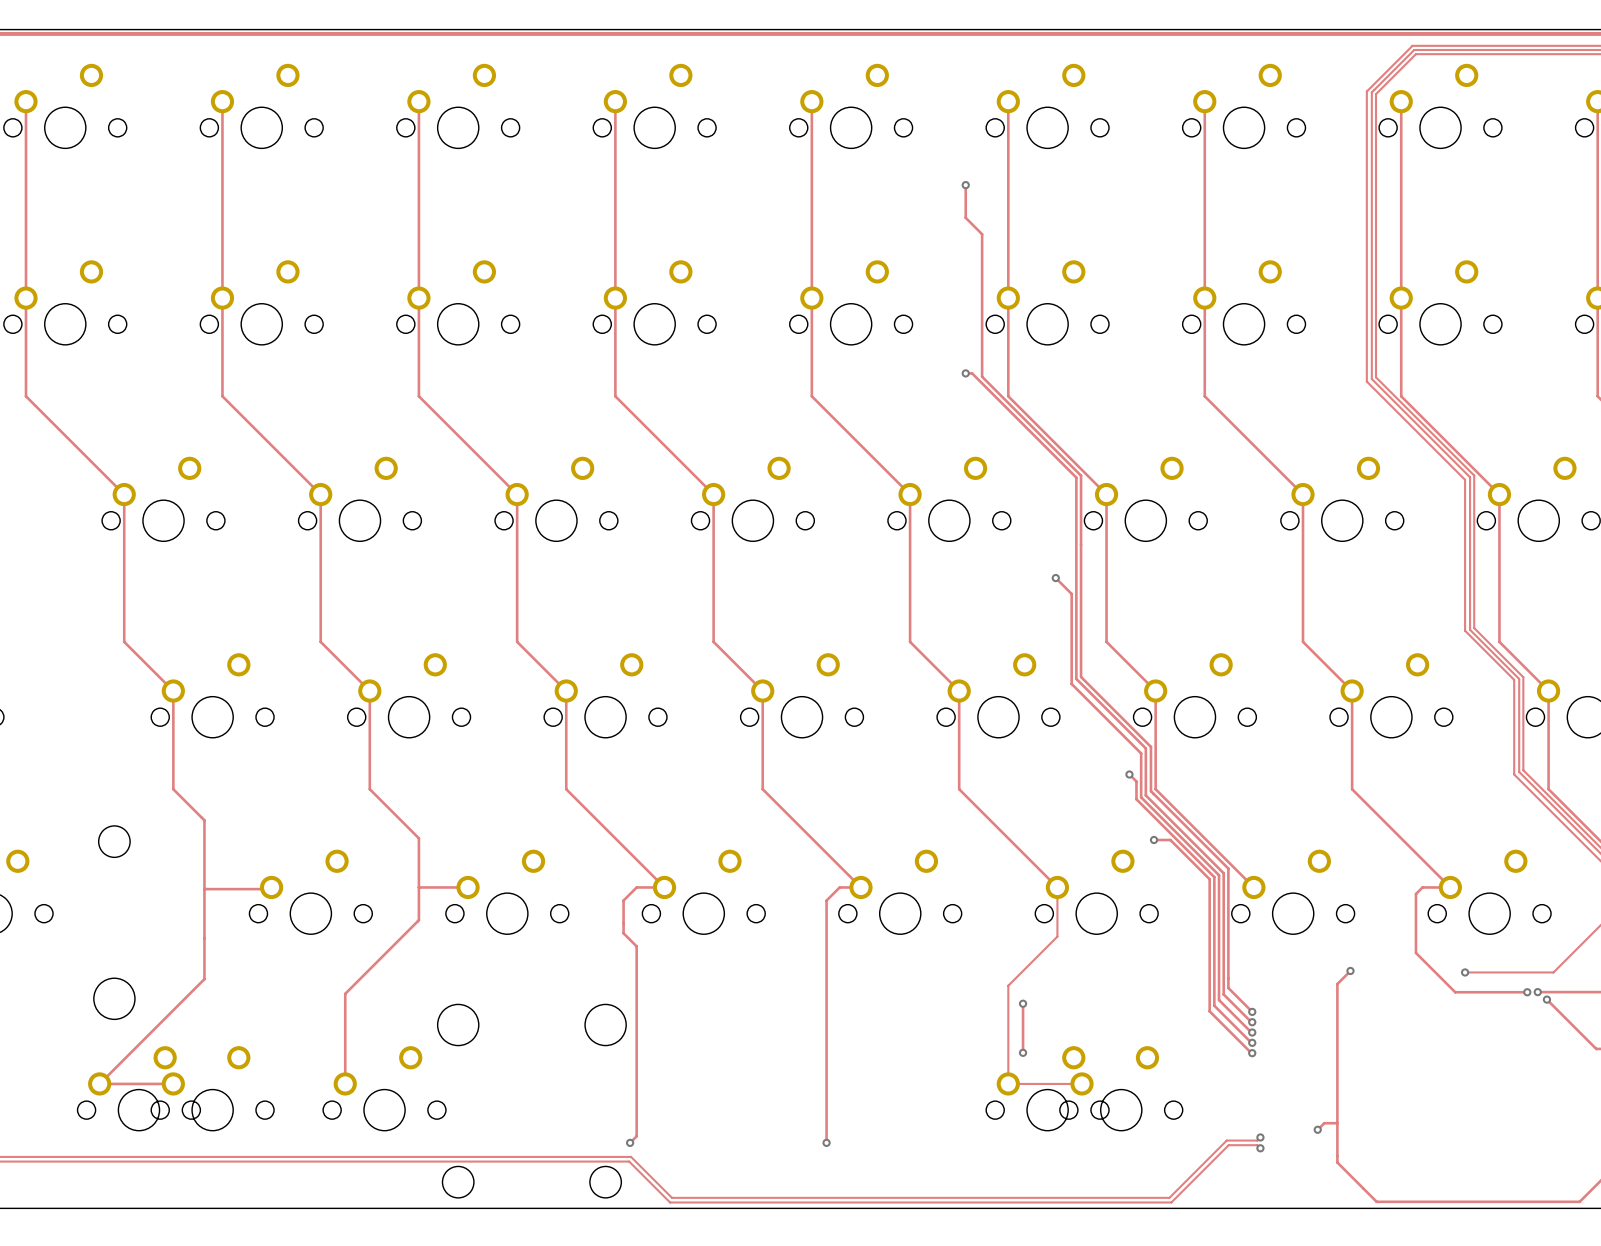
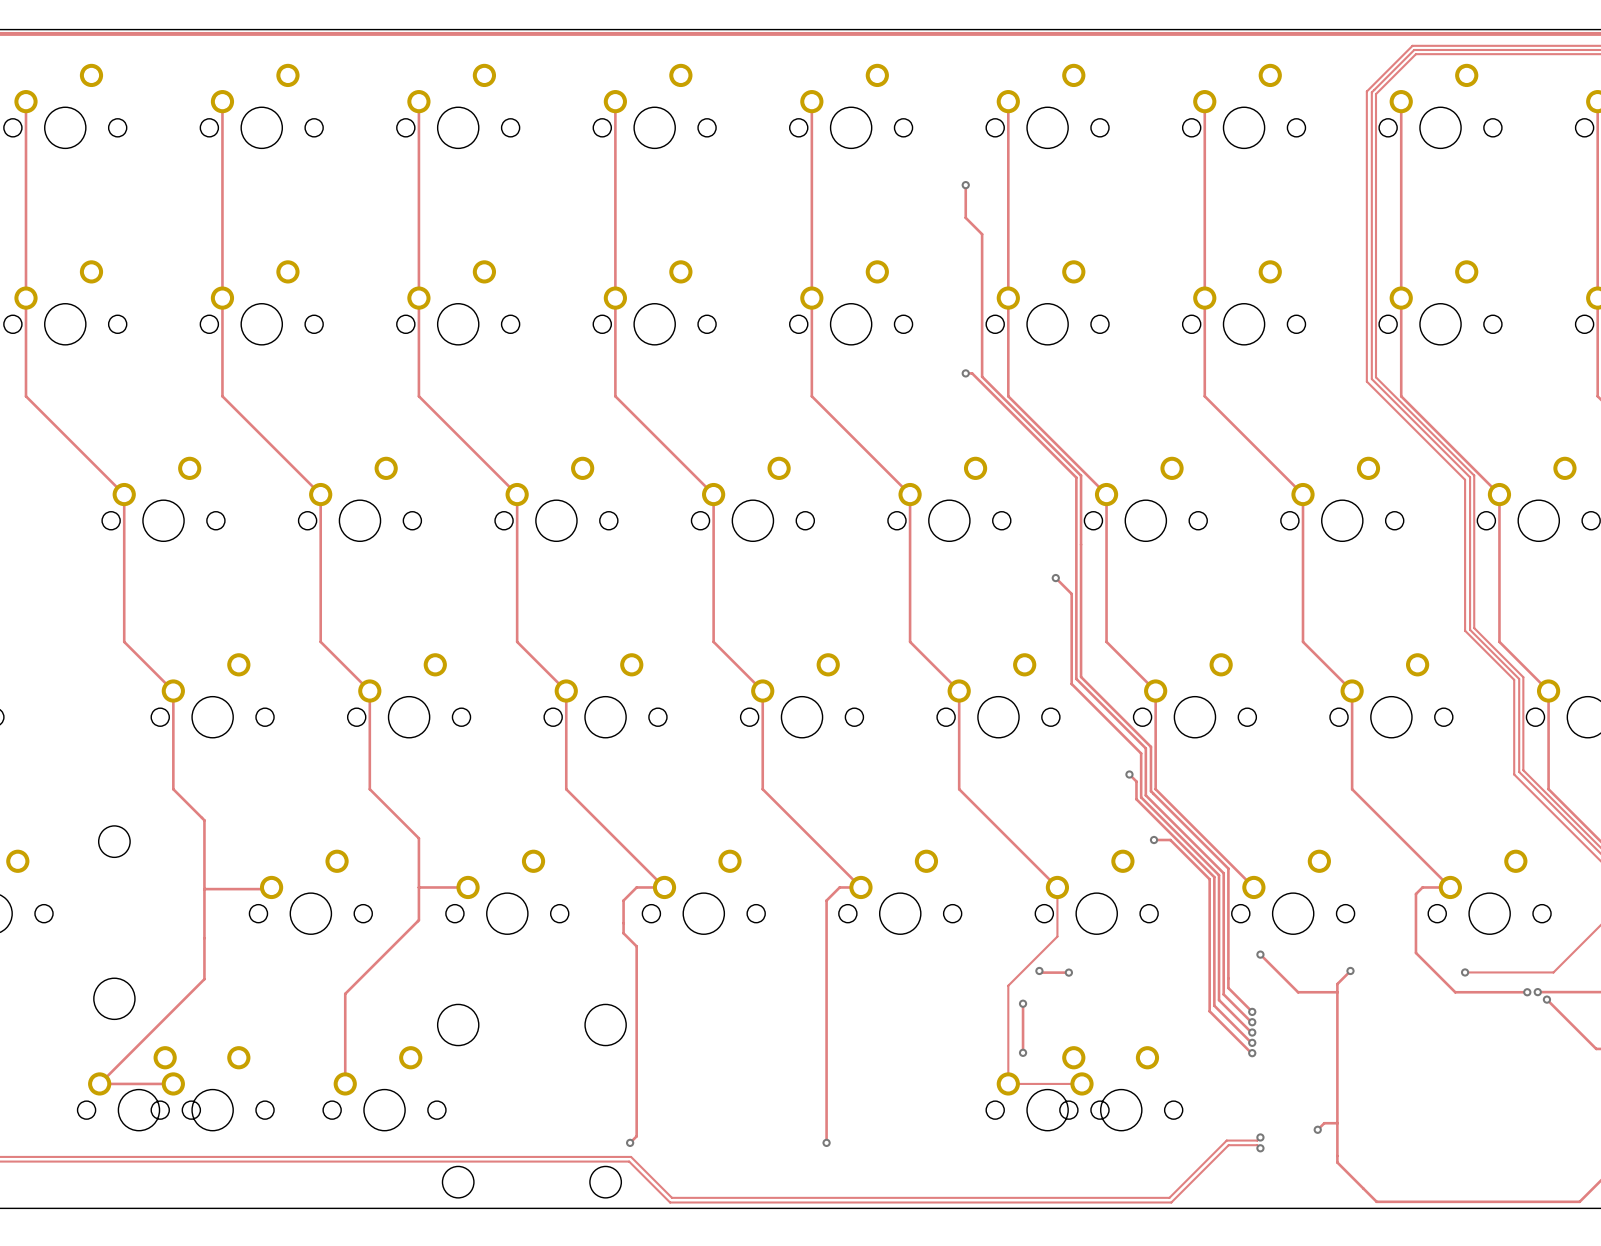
track: none -> (1260, 954) (1298, 992) (1337, 992)
via: none -> (1260, 954)
track: none -> (1039, 970) (1041, 972) (1068, 972)
via: none -> (1039, 970)
via: none -> (1068, 972)

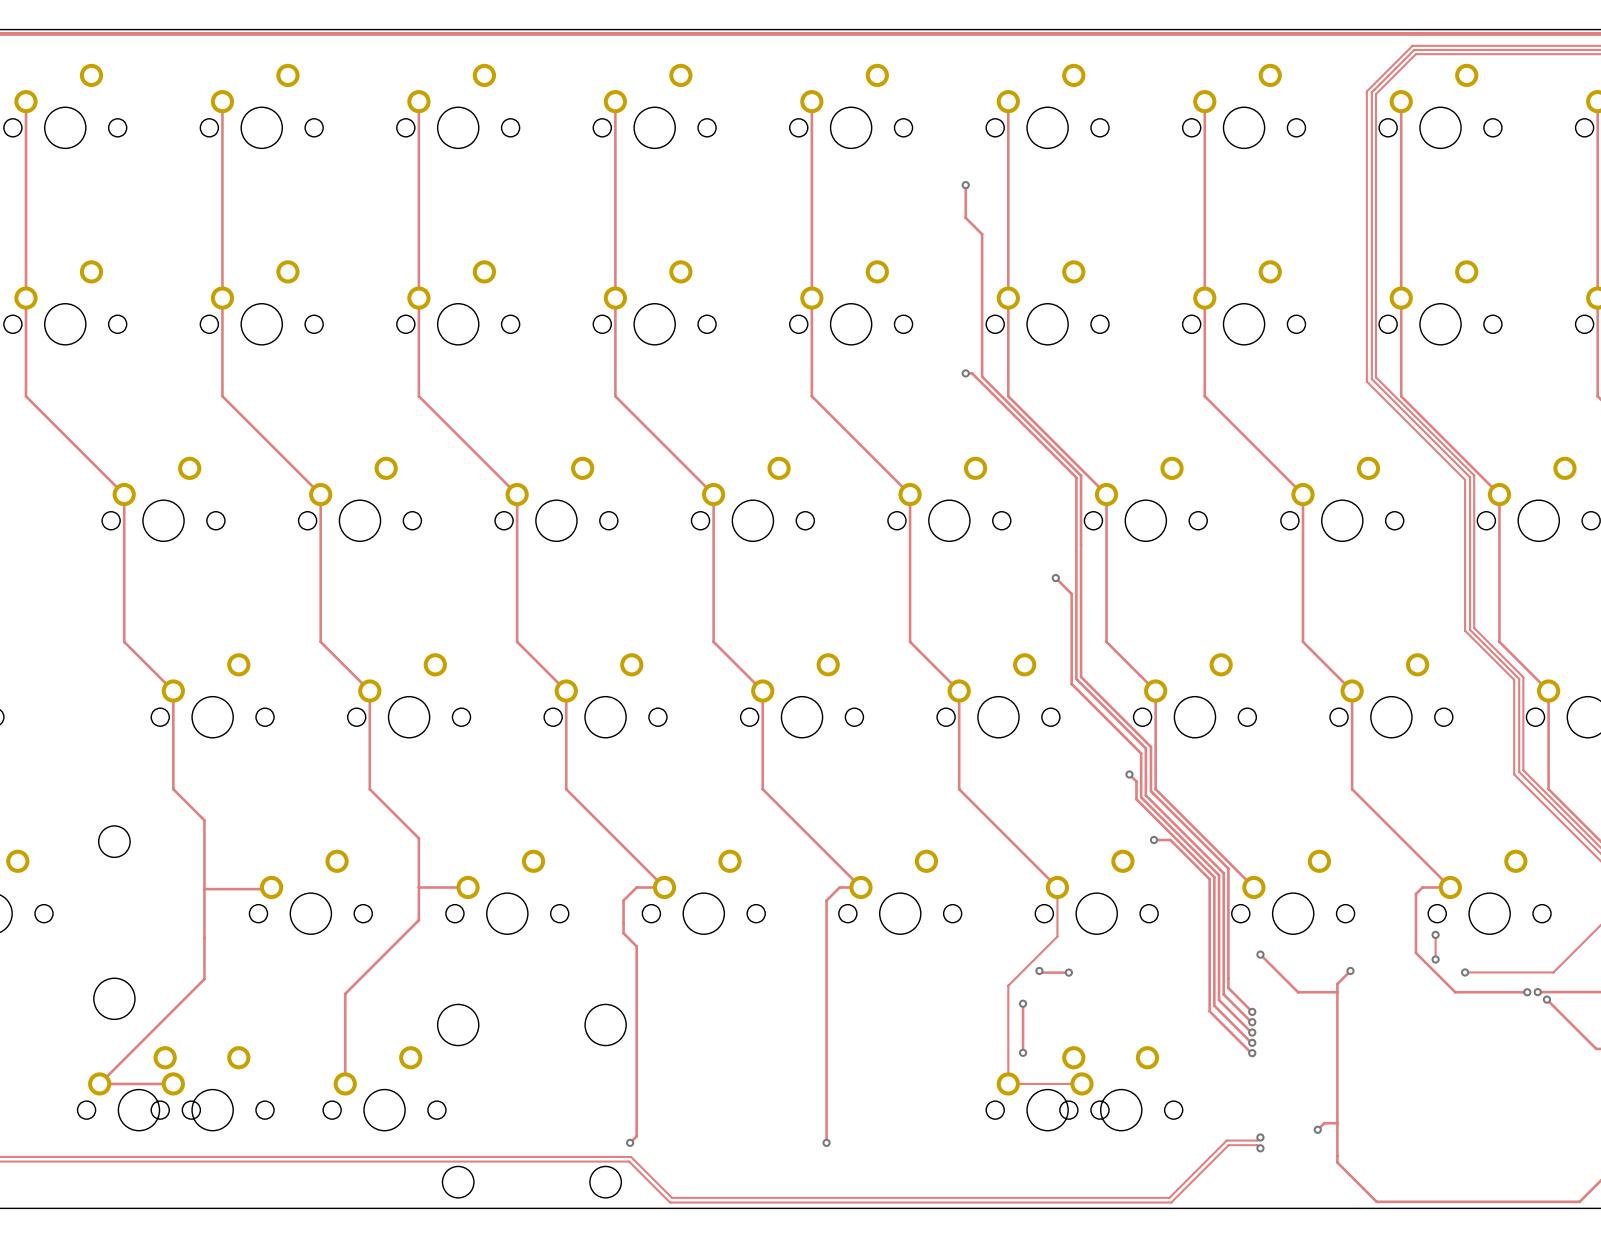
track: none -> (1435, 933) (1435, 959)
via: none -> (1435, 934)
via: none -> (1435, 959)

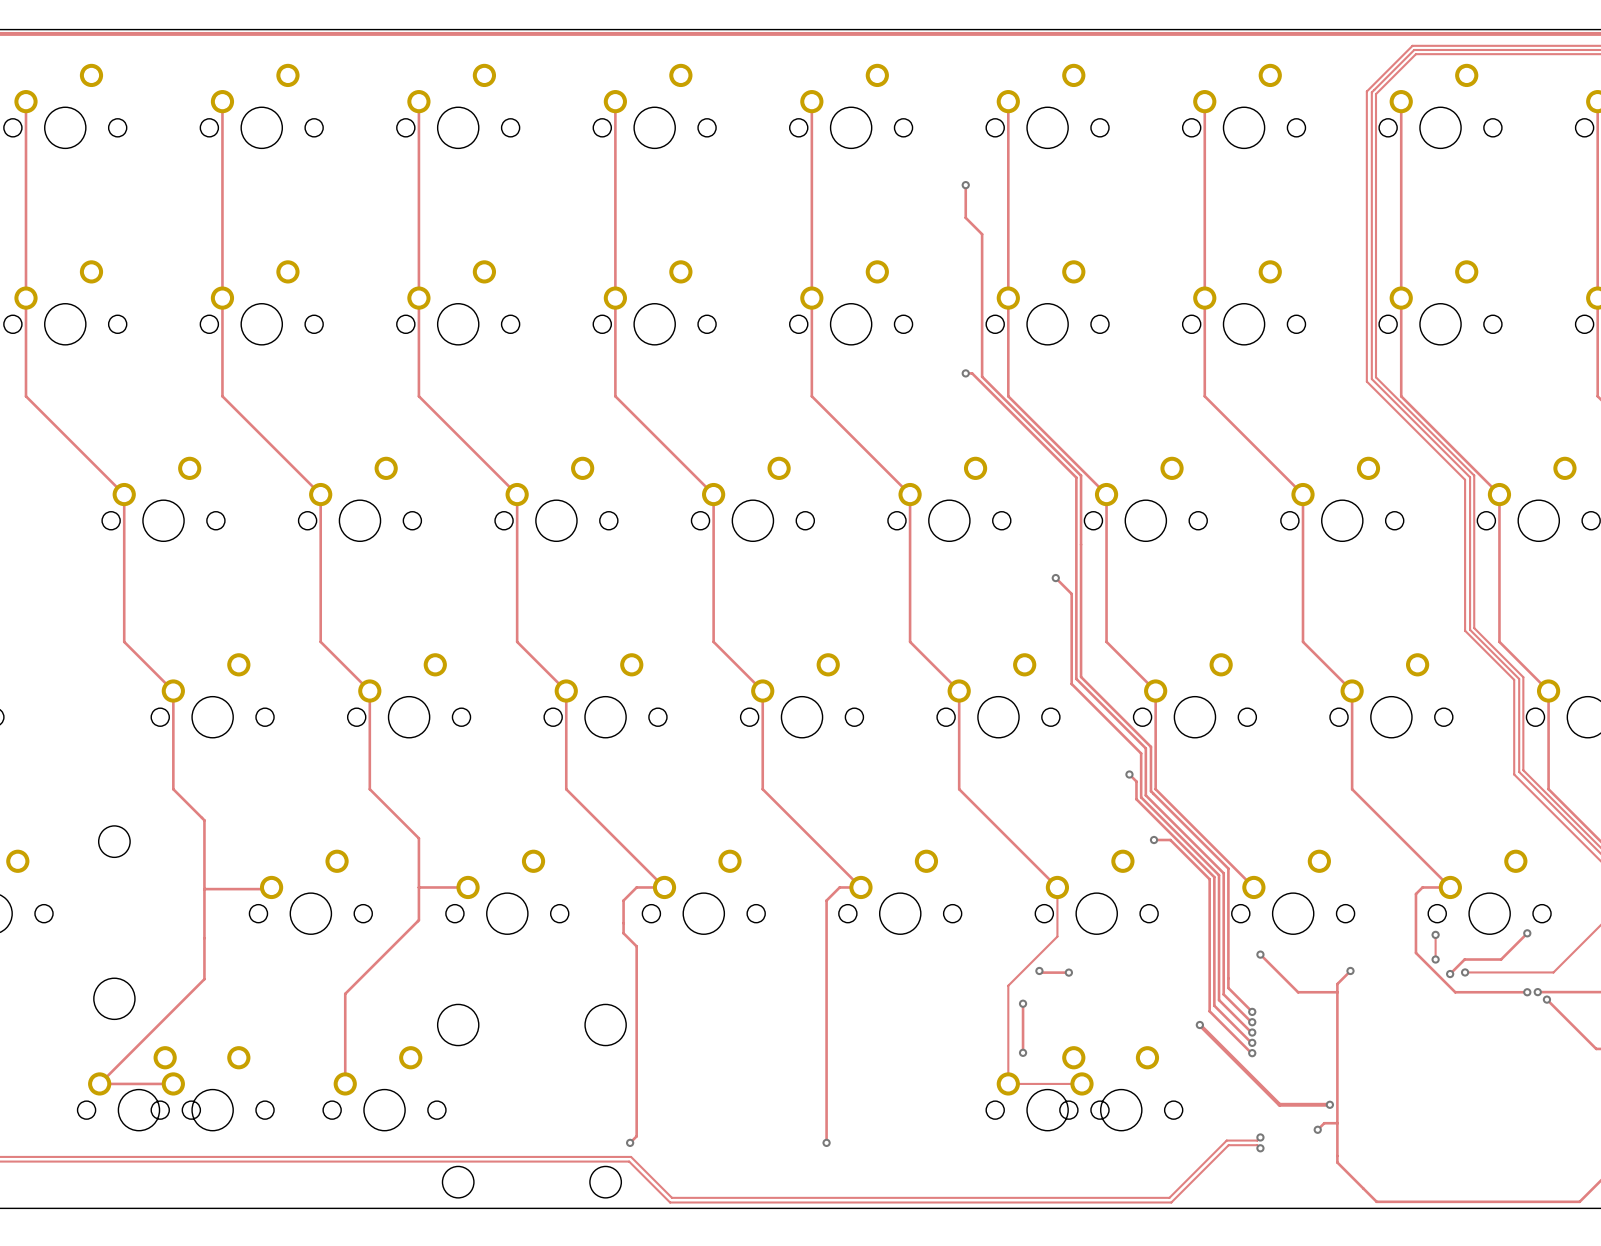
track: none -> (1527, 933) (1501, 959) (1464, 959) (1450, 974)
via: none -> (1527, 933)
via: none -> (1450, 974)
track: none -> (1199, 1025) (1279, 1104) (1329, 1104)
via: none -> (1199, 1025)
via: none -> (1329, 1104)

